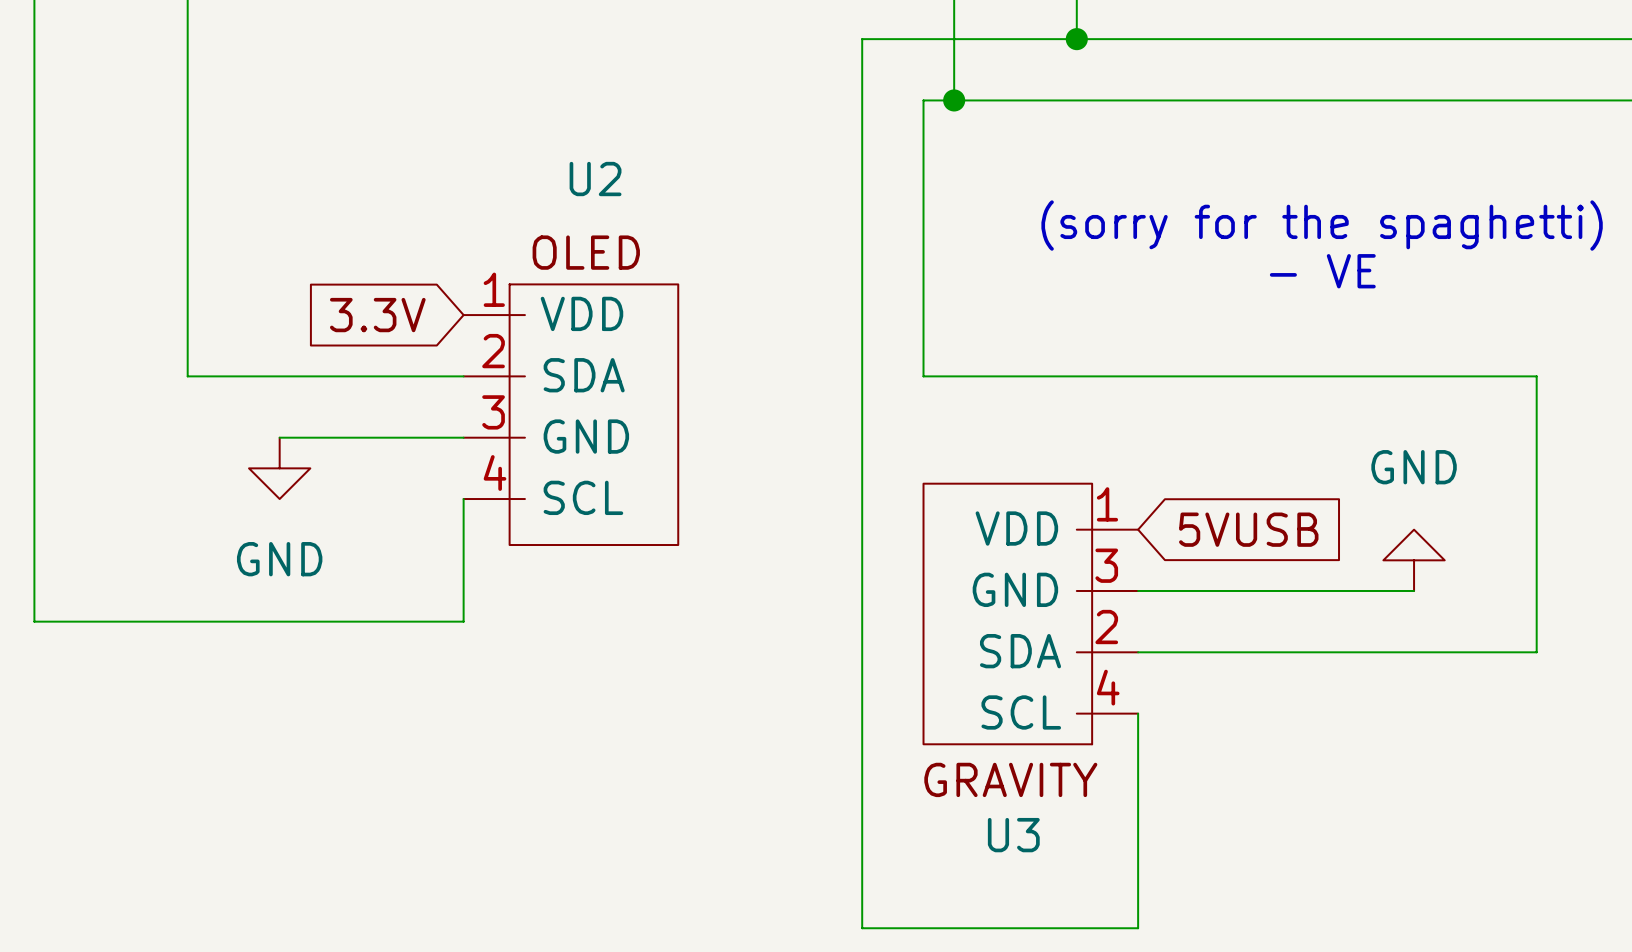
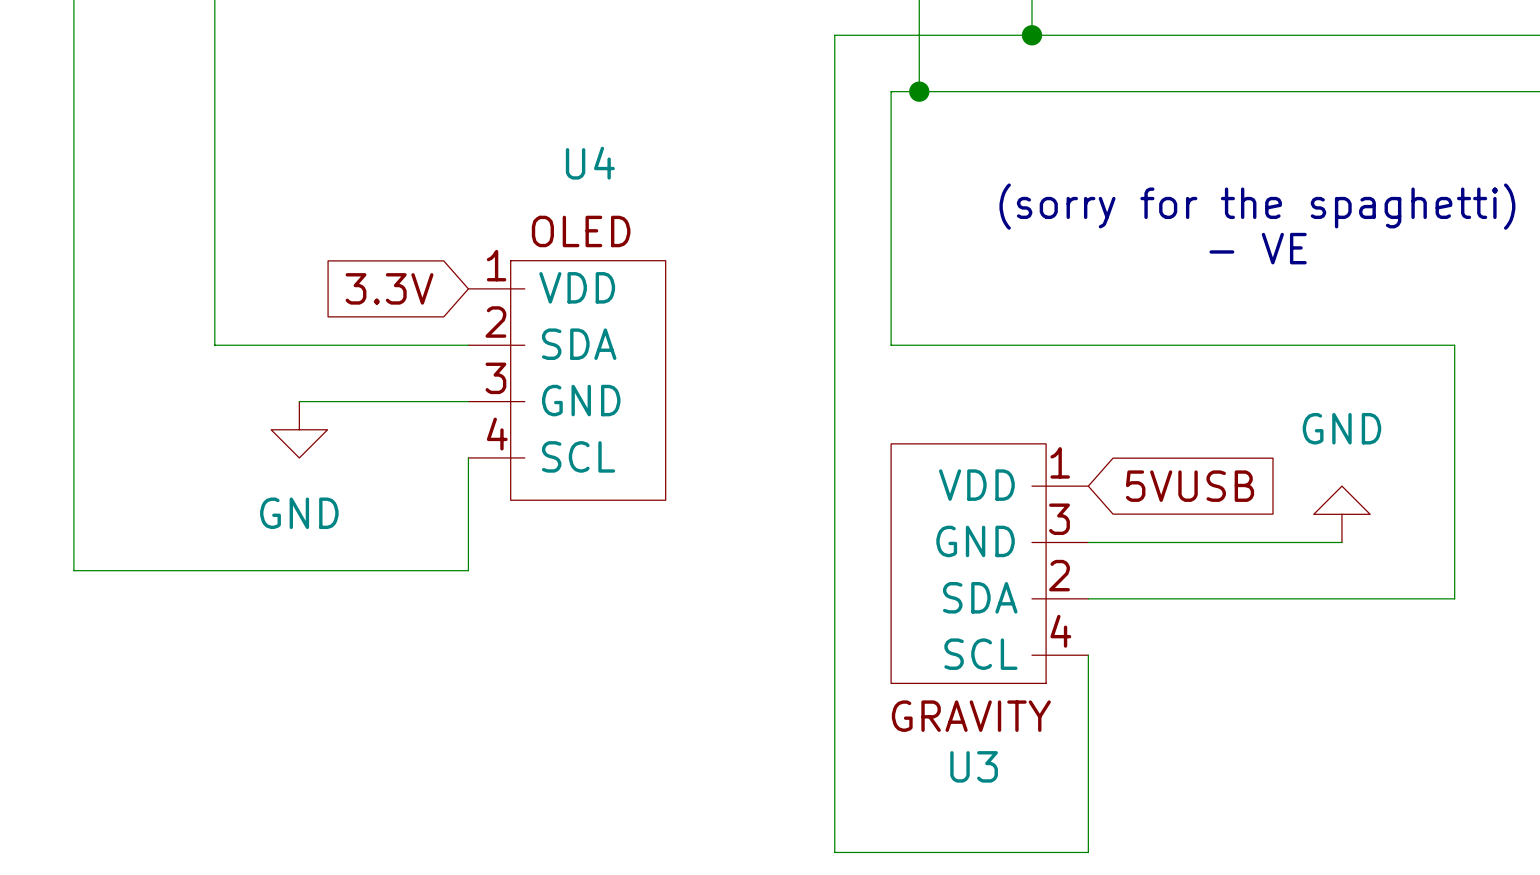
U2 name: U2 (595, 179) -> U4 (590, 163)

